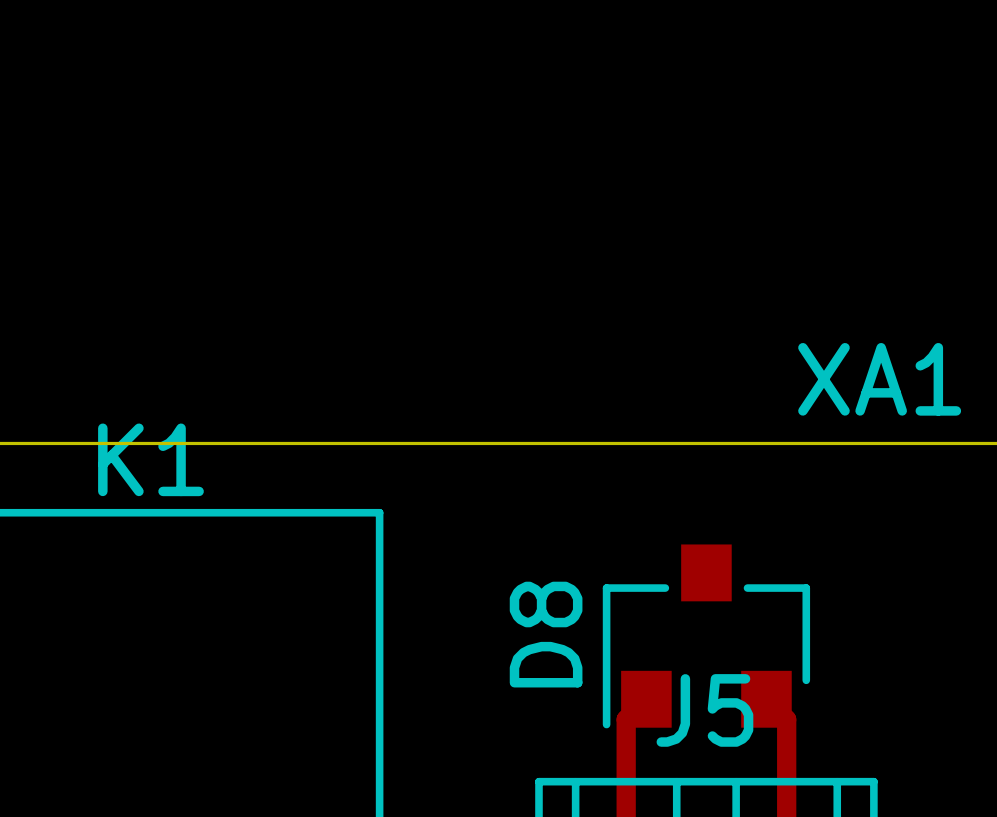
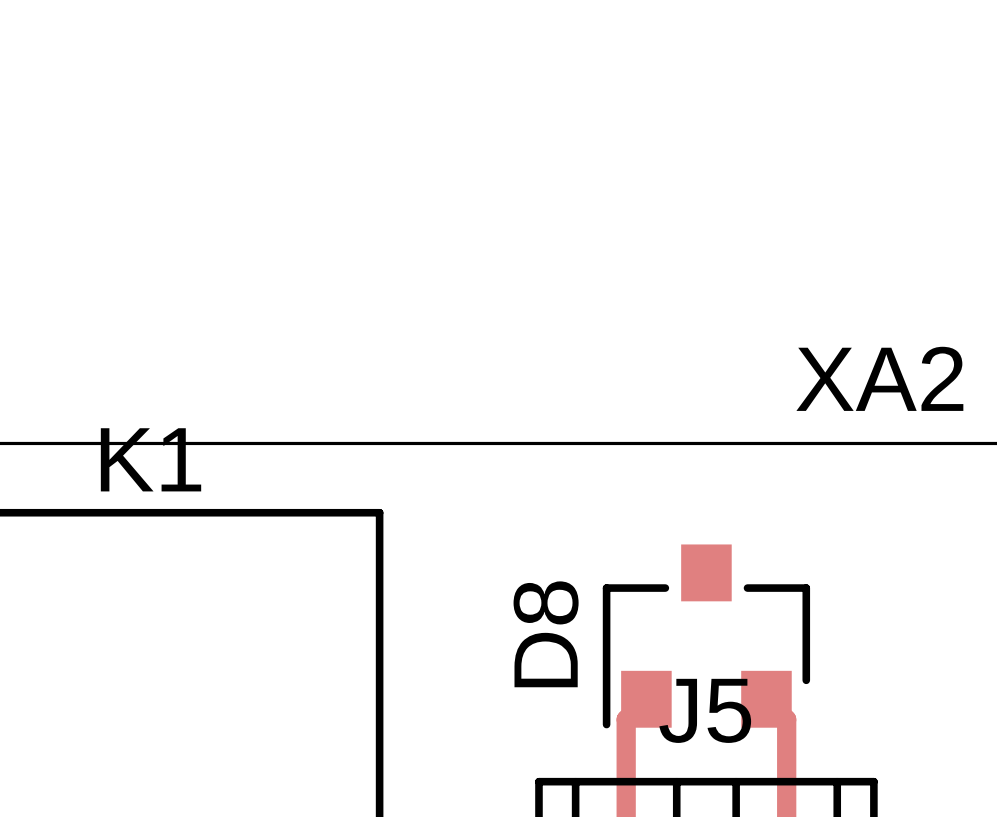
XA1 name: XA1 (879, 379) -> XA2 (879, 378)

